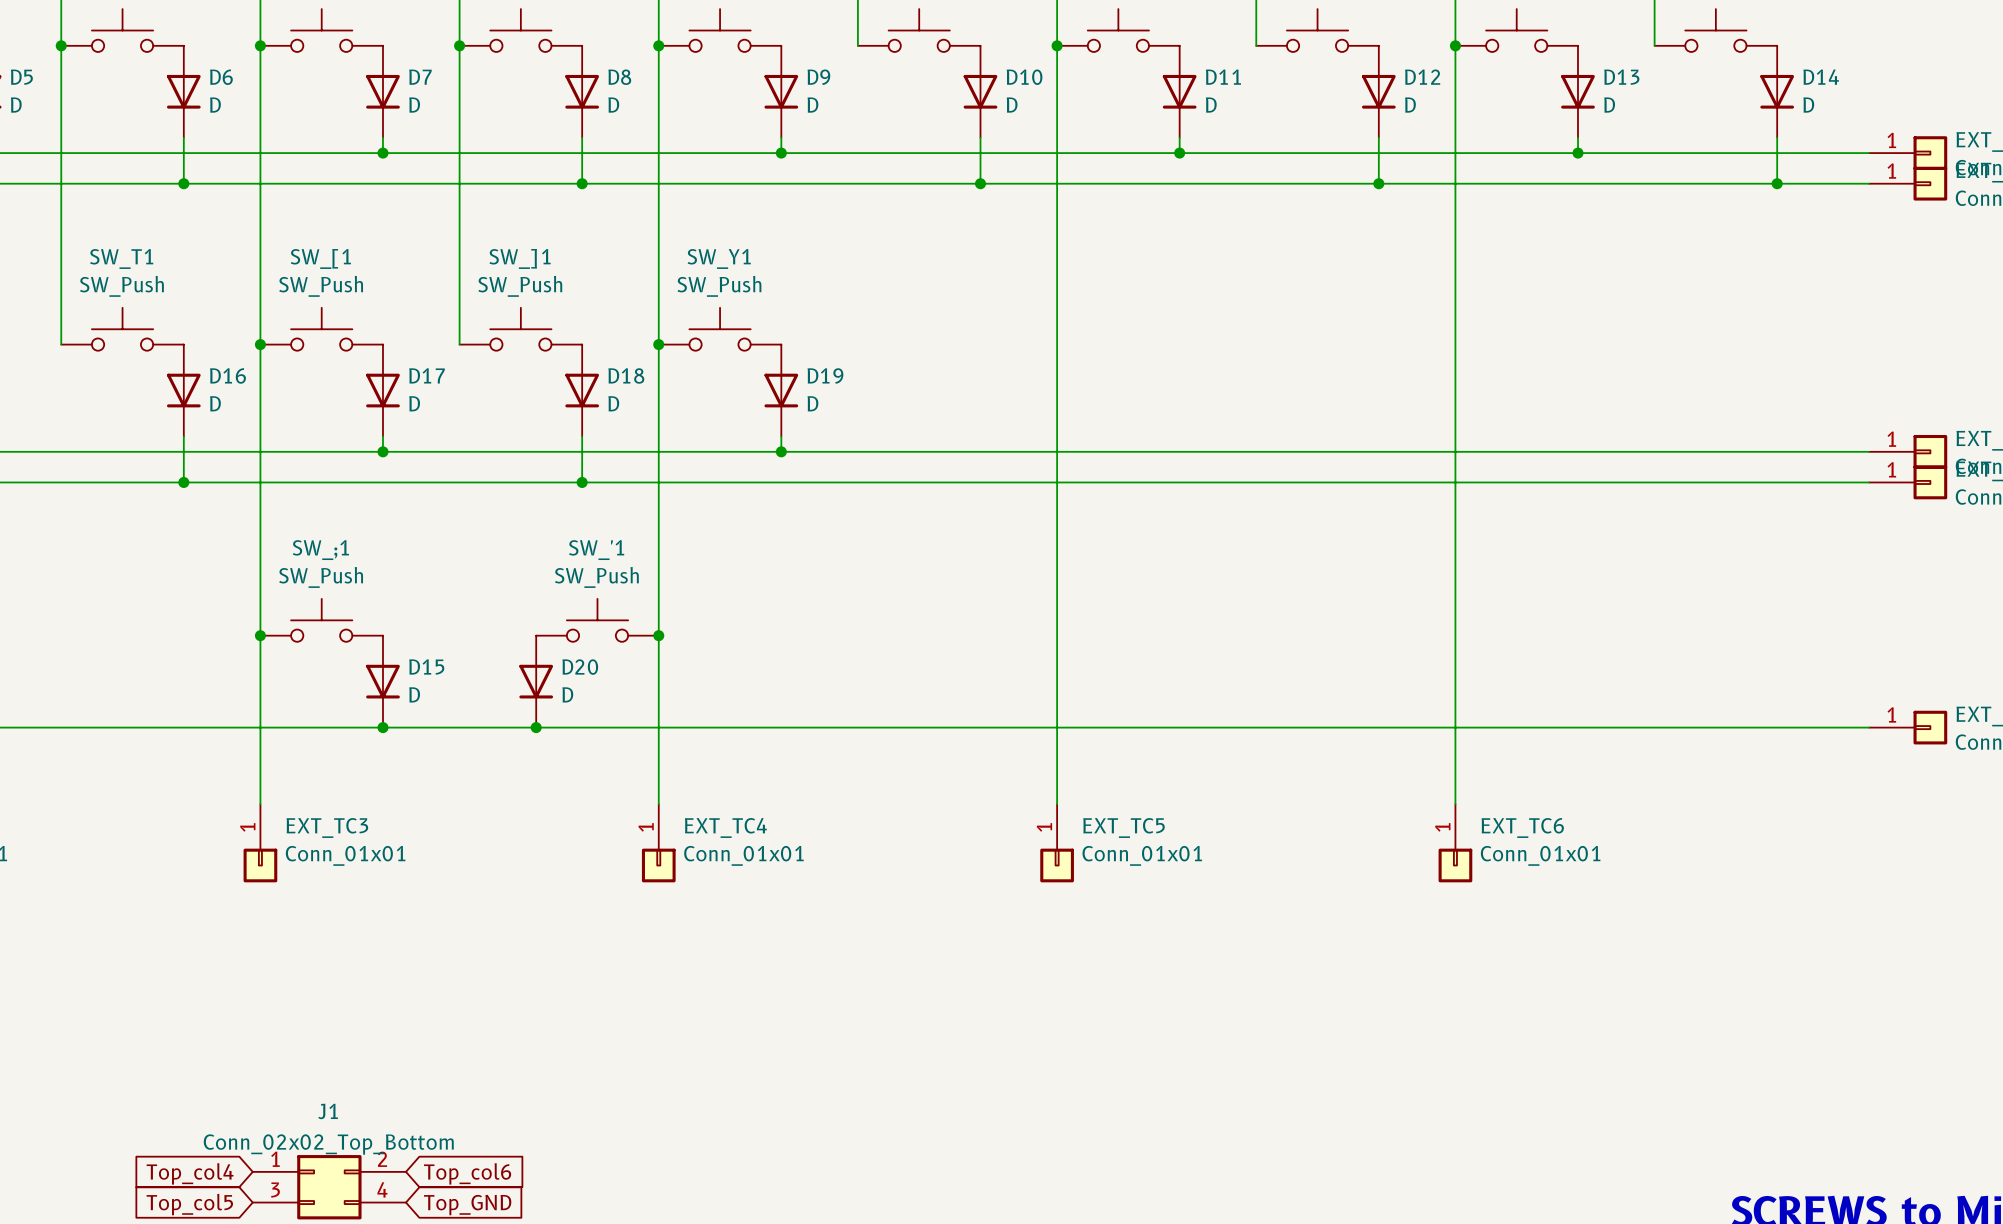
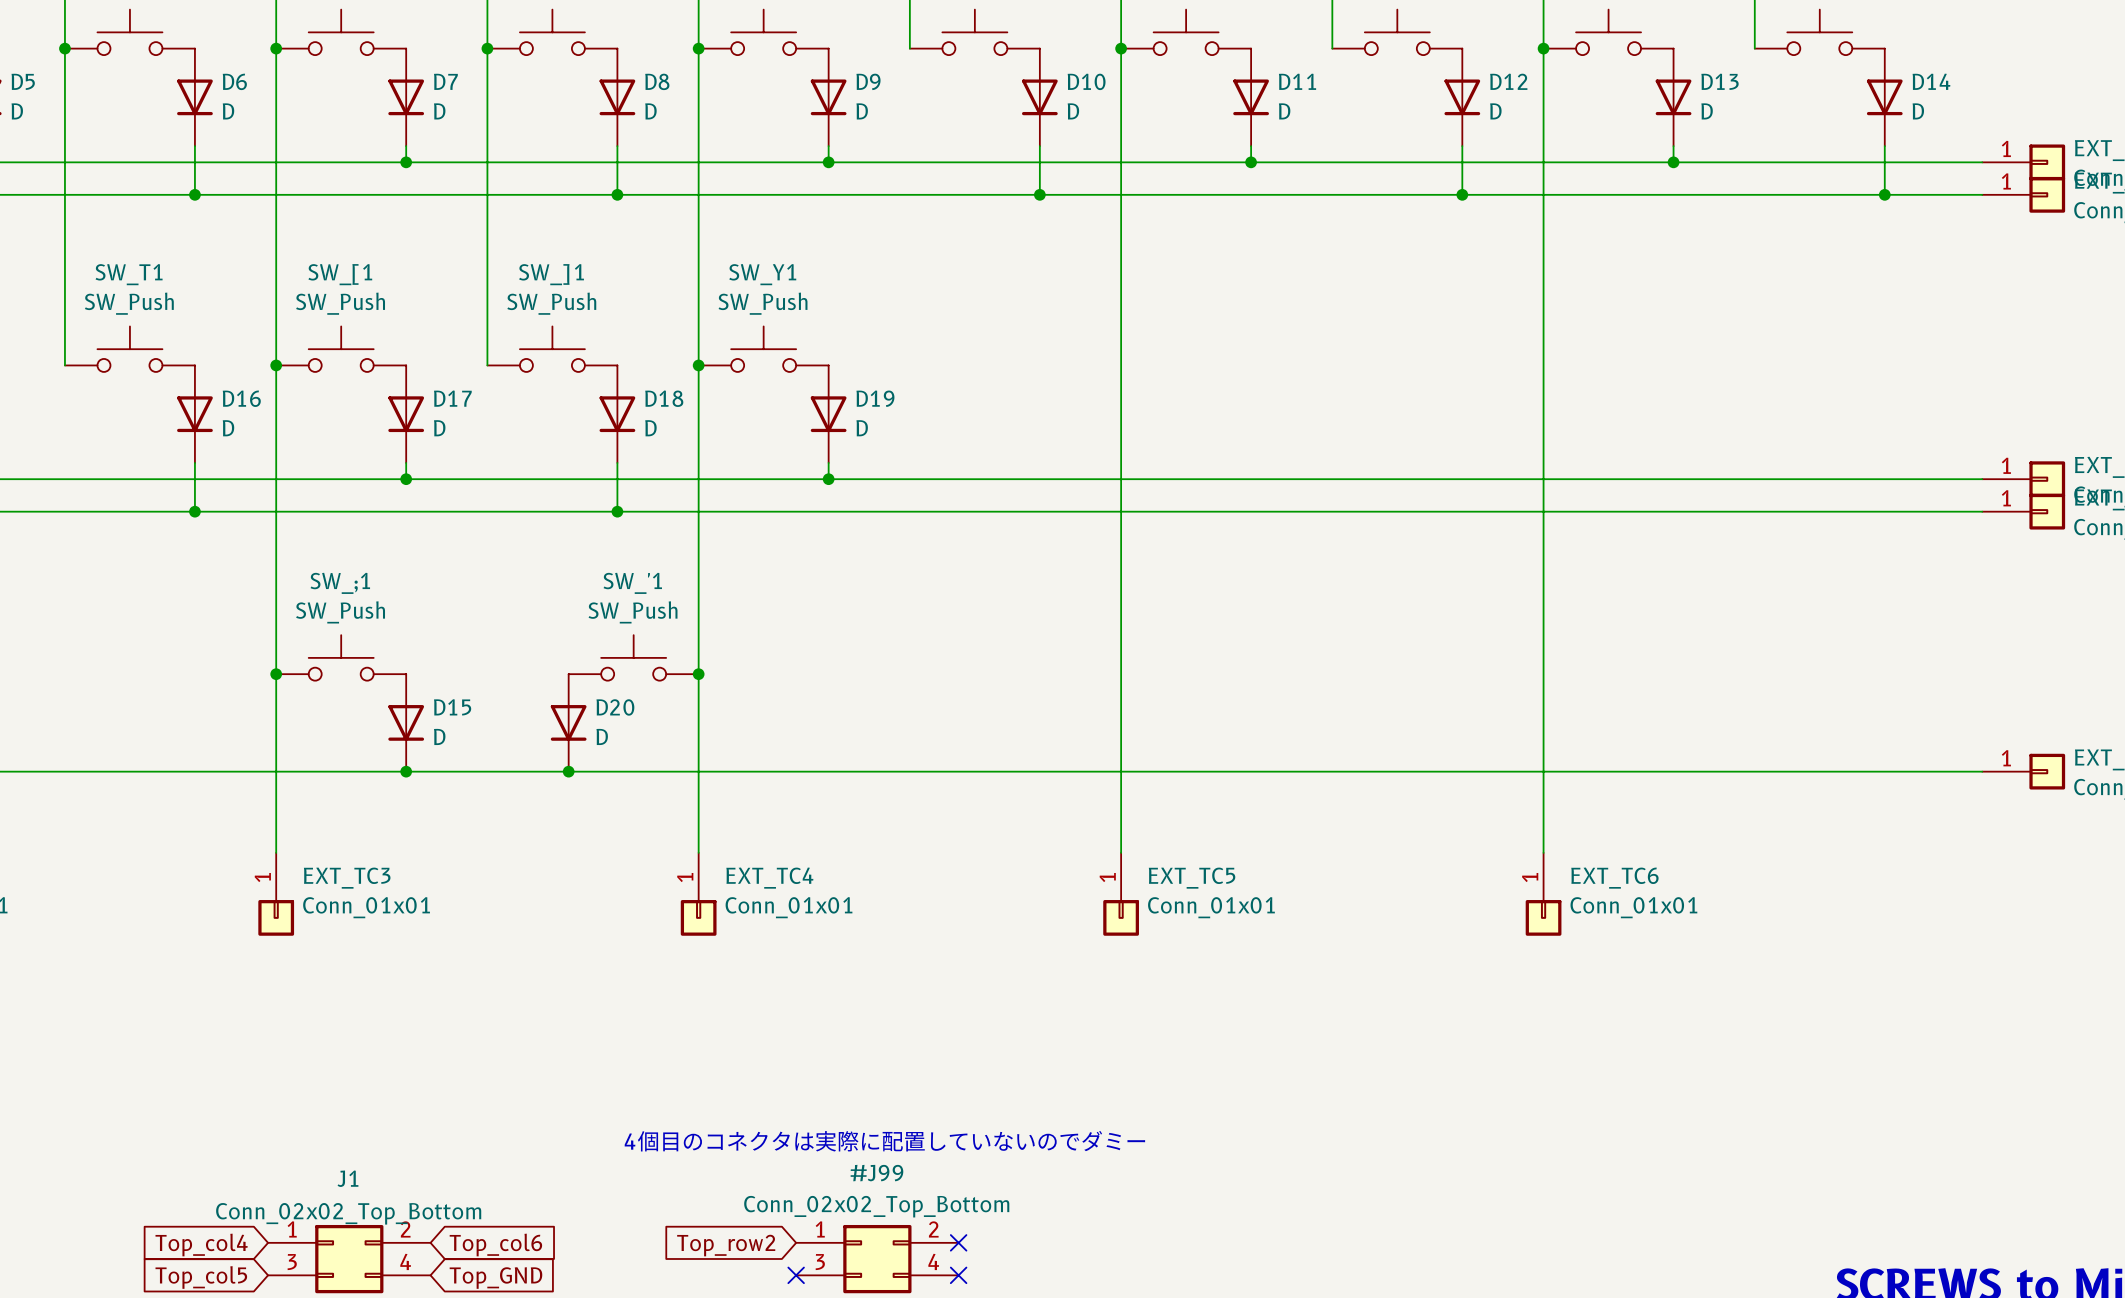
text: none -> 4個目のコネクタは実際に配置していないのでダミー (884, 1141)
no-connect mark: none -> (958, 1242)
global label: none -> Top_row2 (726, 1245)
#J99: none -> Conn_02x02_Top_Bottom (877, 1259)
no-connect mark: none -> (796, 1275)
no-connect mark: none -> (958, 1275)

